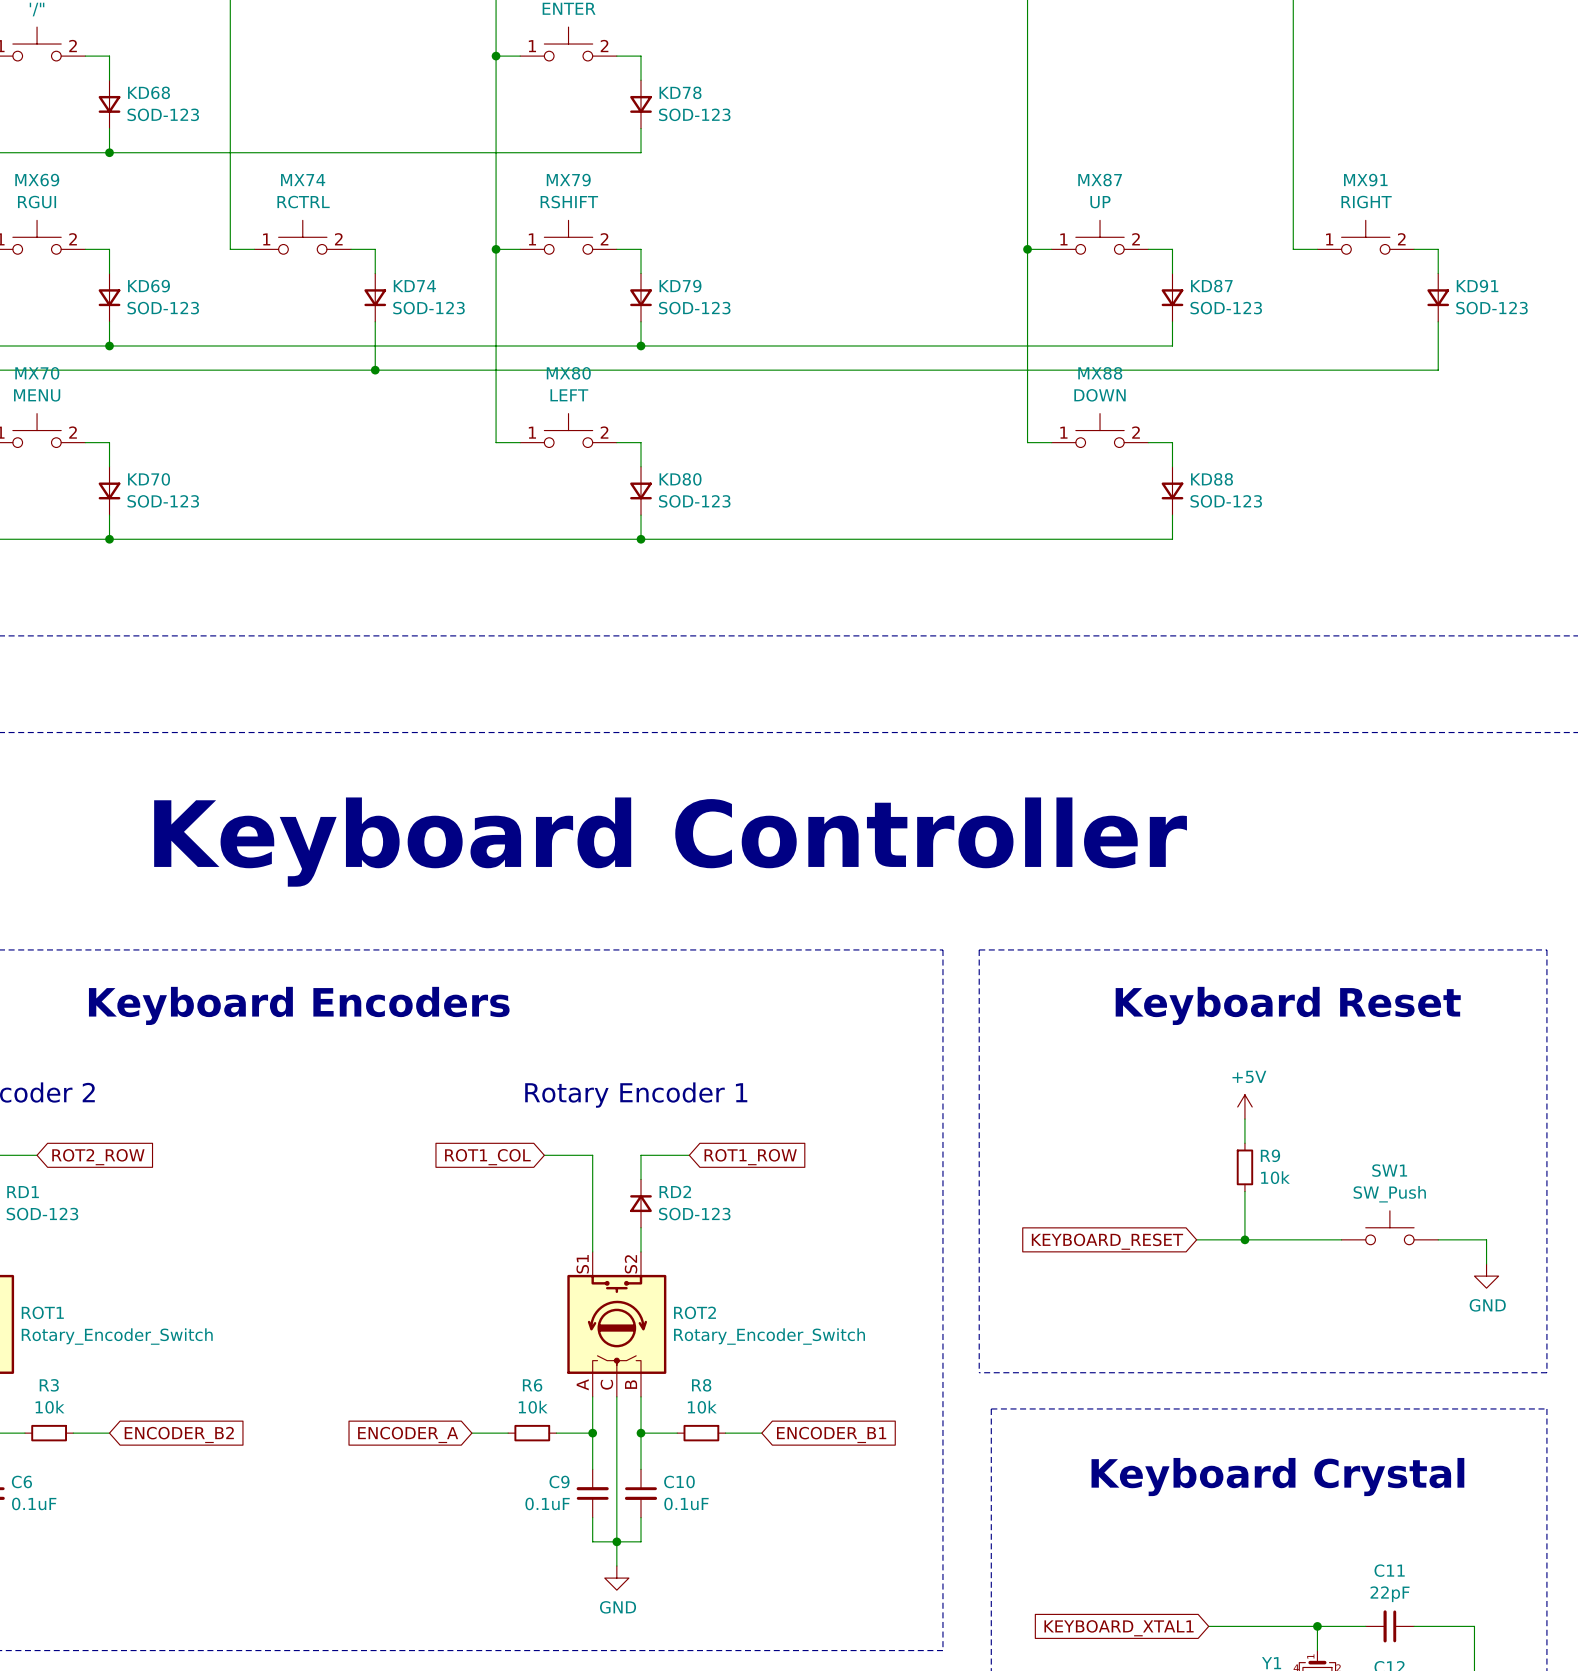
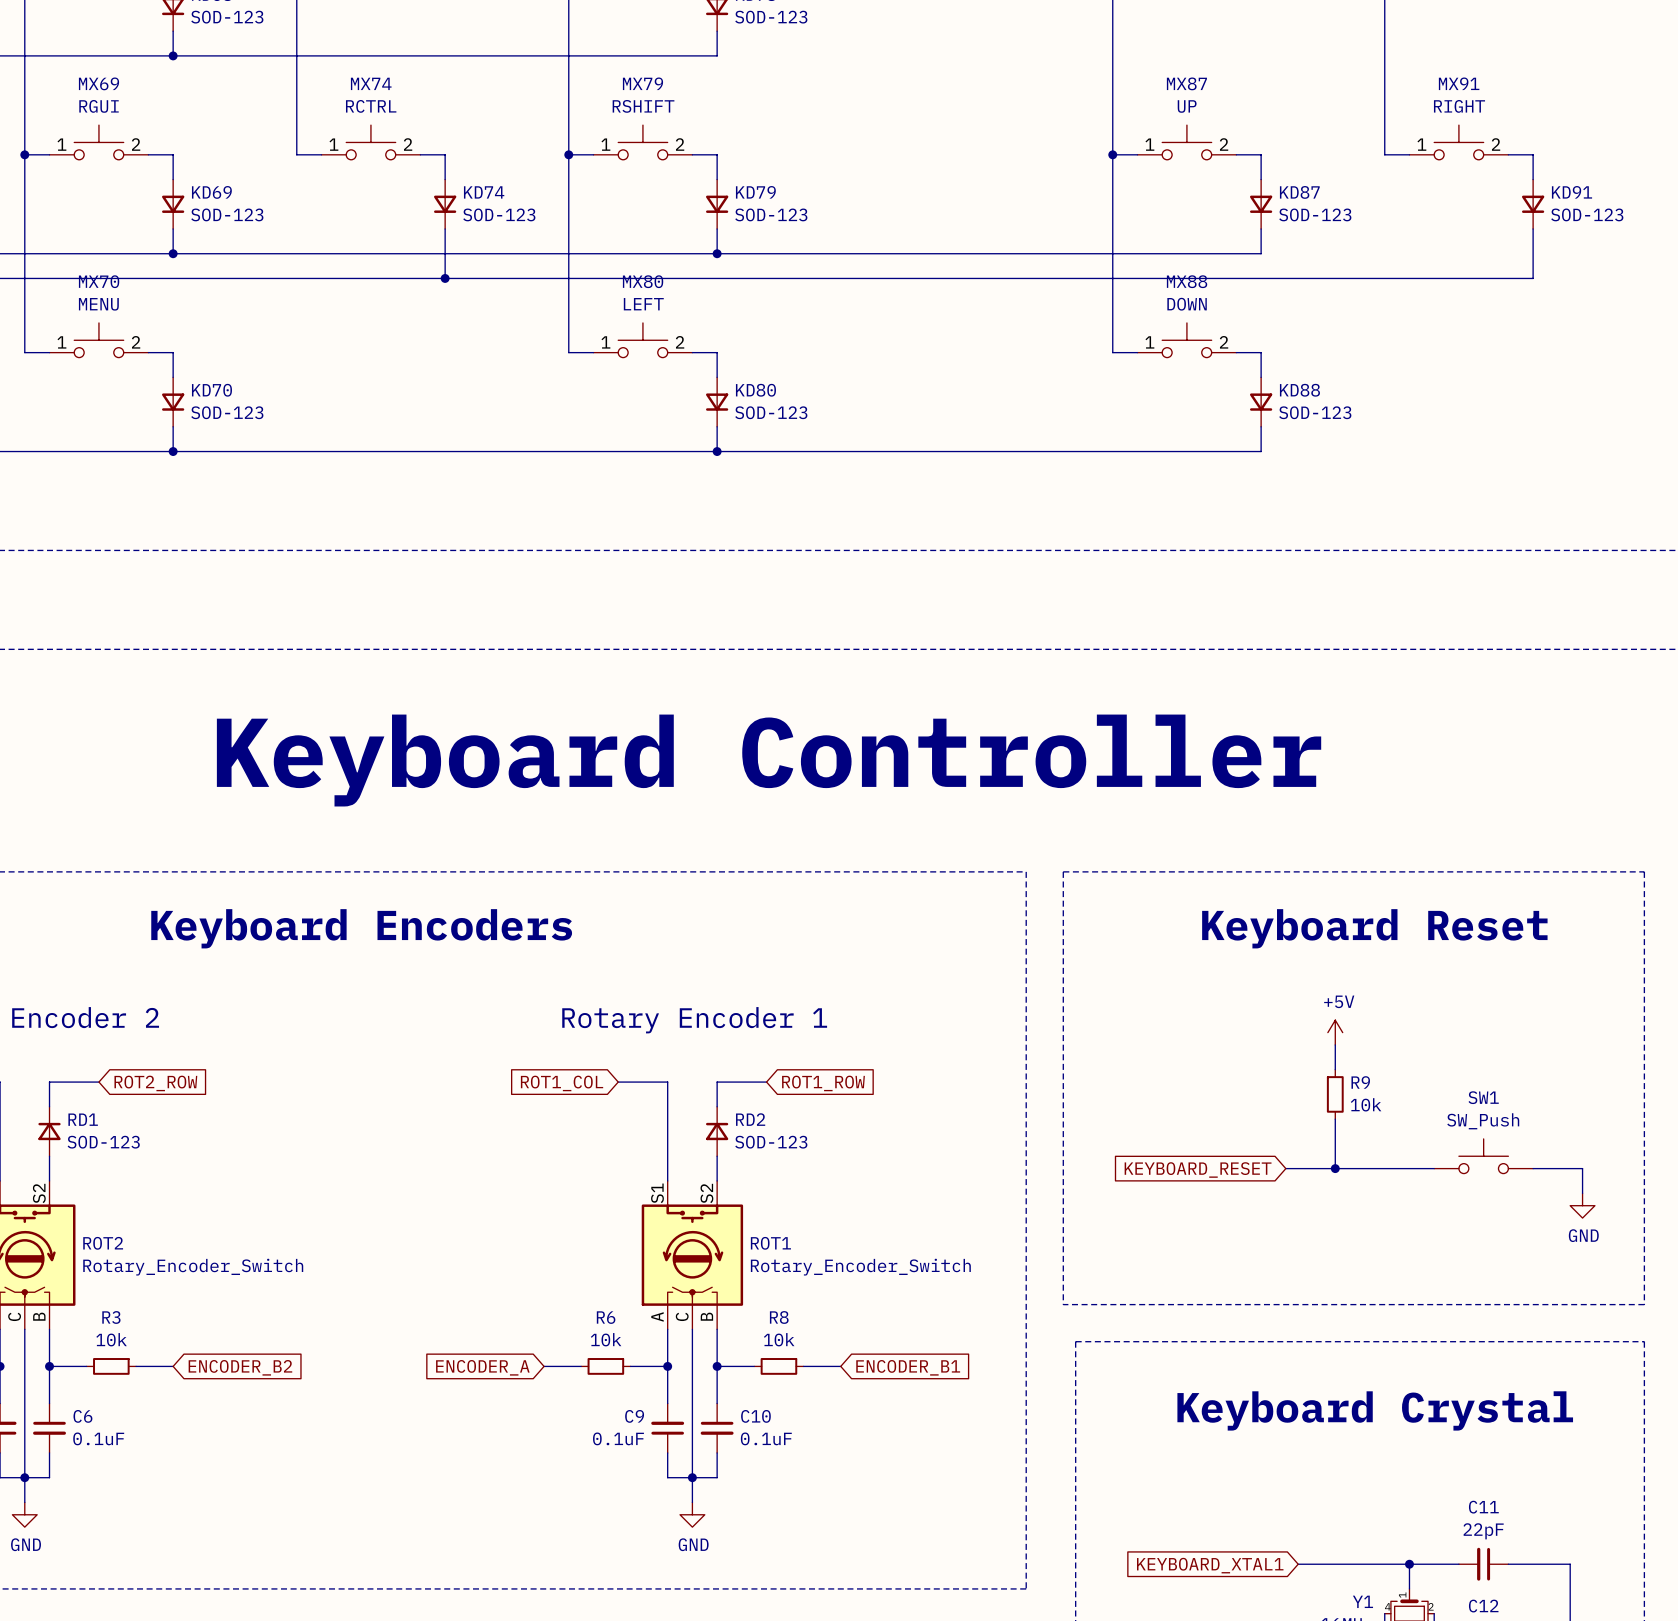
ROT1 name: ROT1 (42, 1312) -> ROT2 (103, 1243)
ROT2 name: ROT2 (694, 1312) -> ROT1 (770, 1243)

